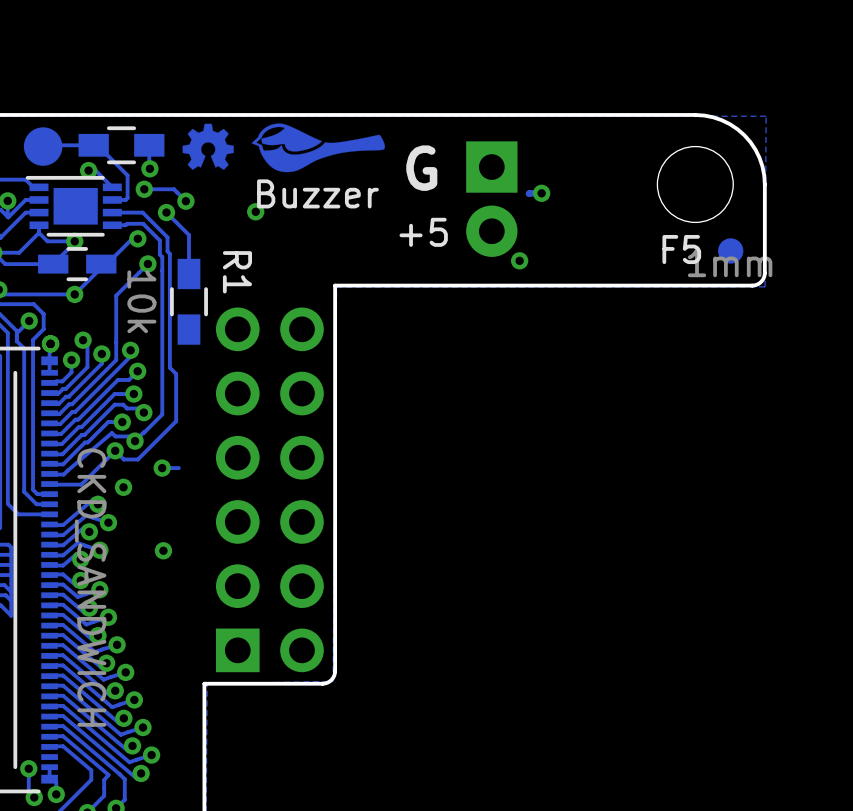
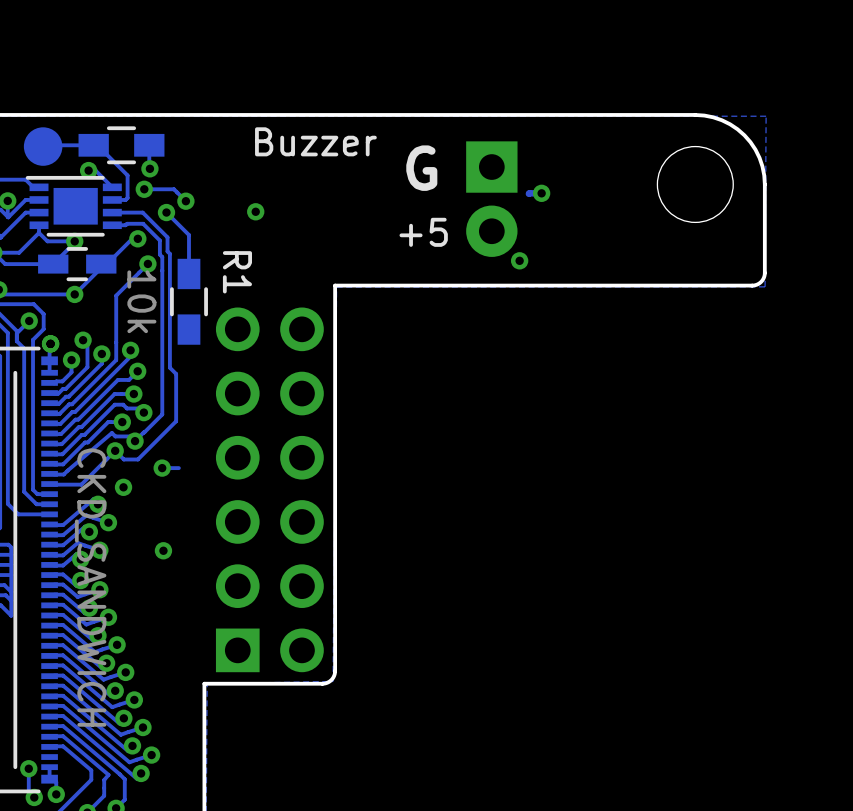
drawing: [182, 123, 385, 173] -> none
text position: Buzzer (317, 193) -> Buzzer (315, 141)
F5: 1mm (730, 250) -> none

